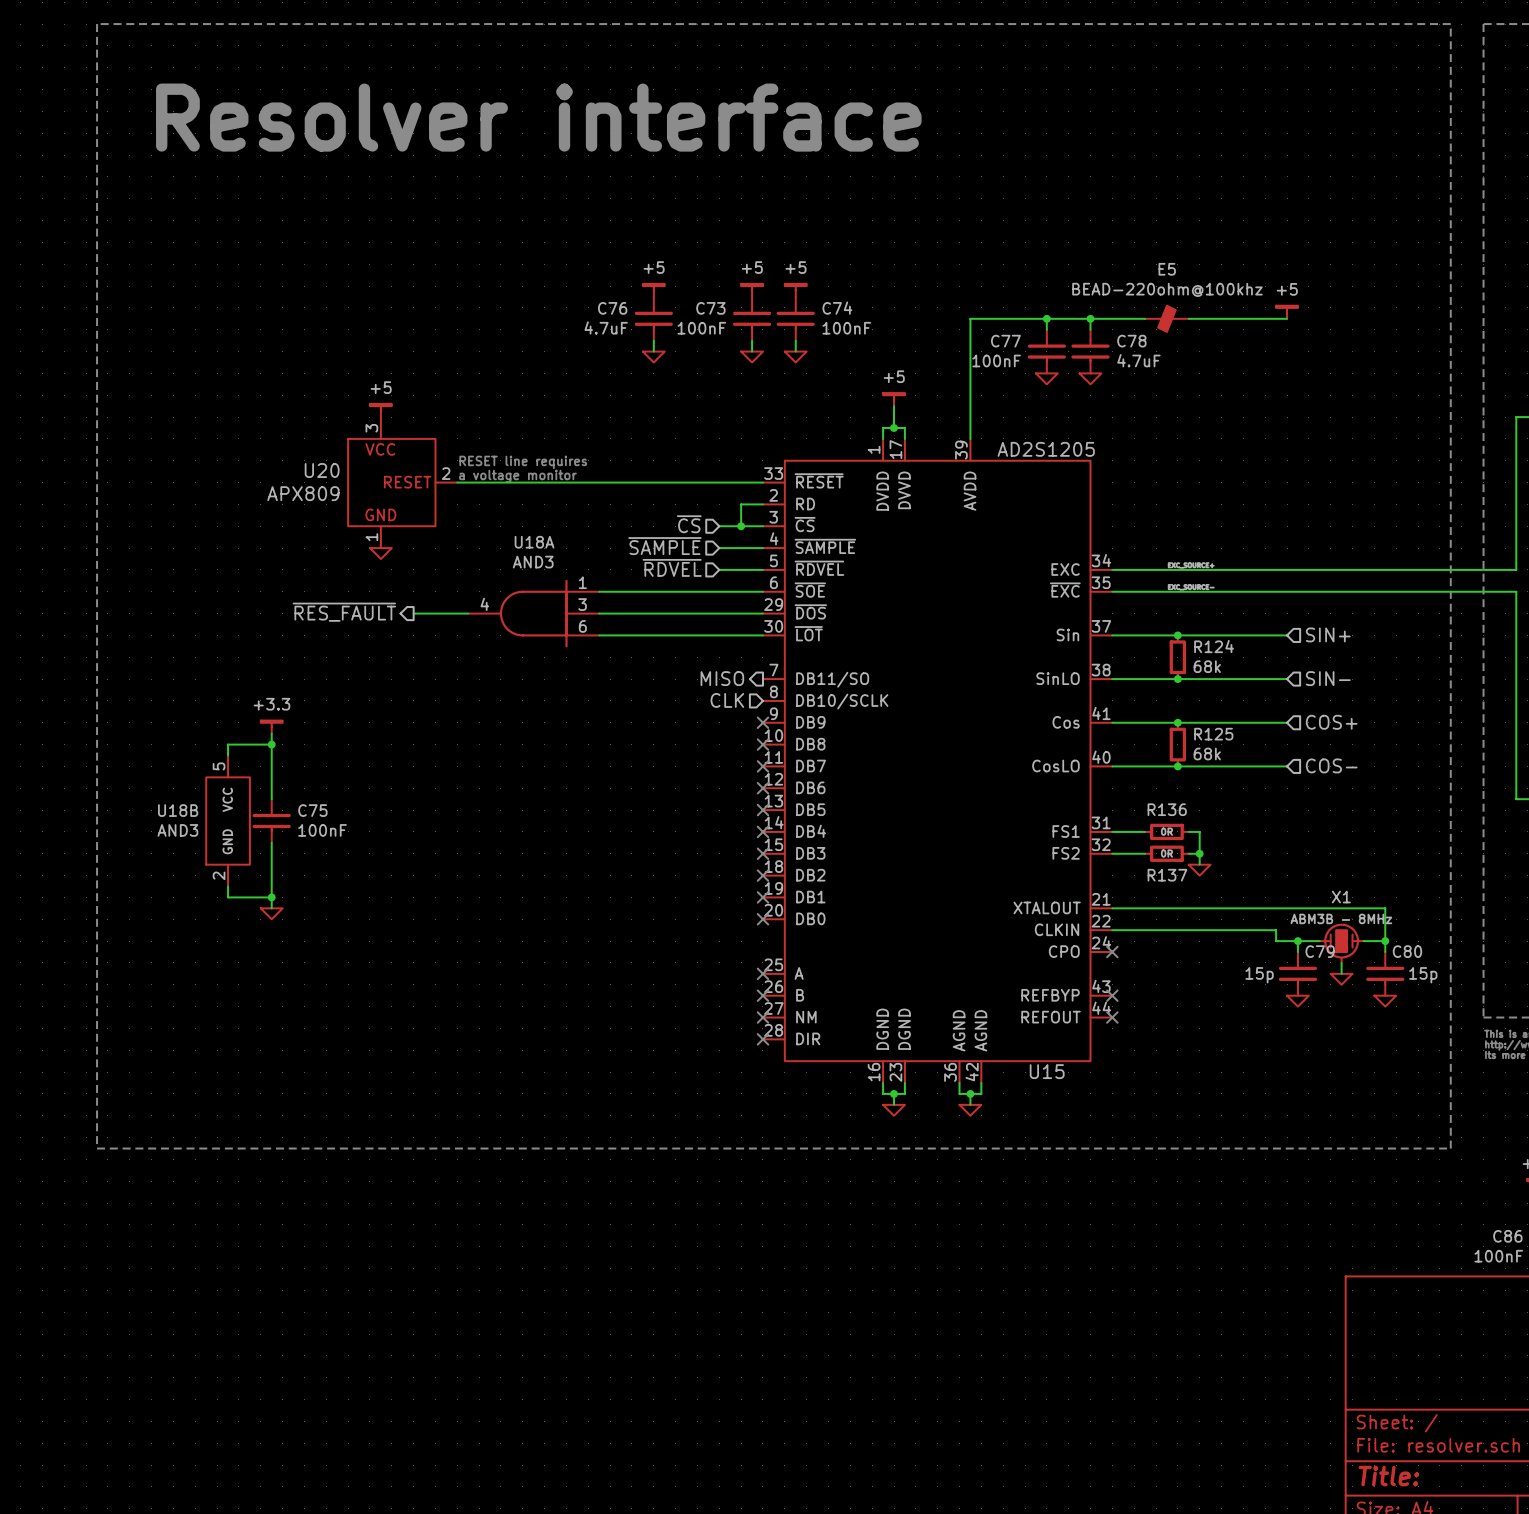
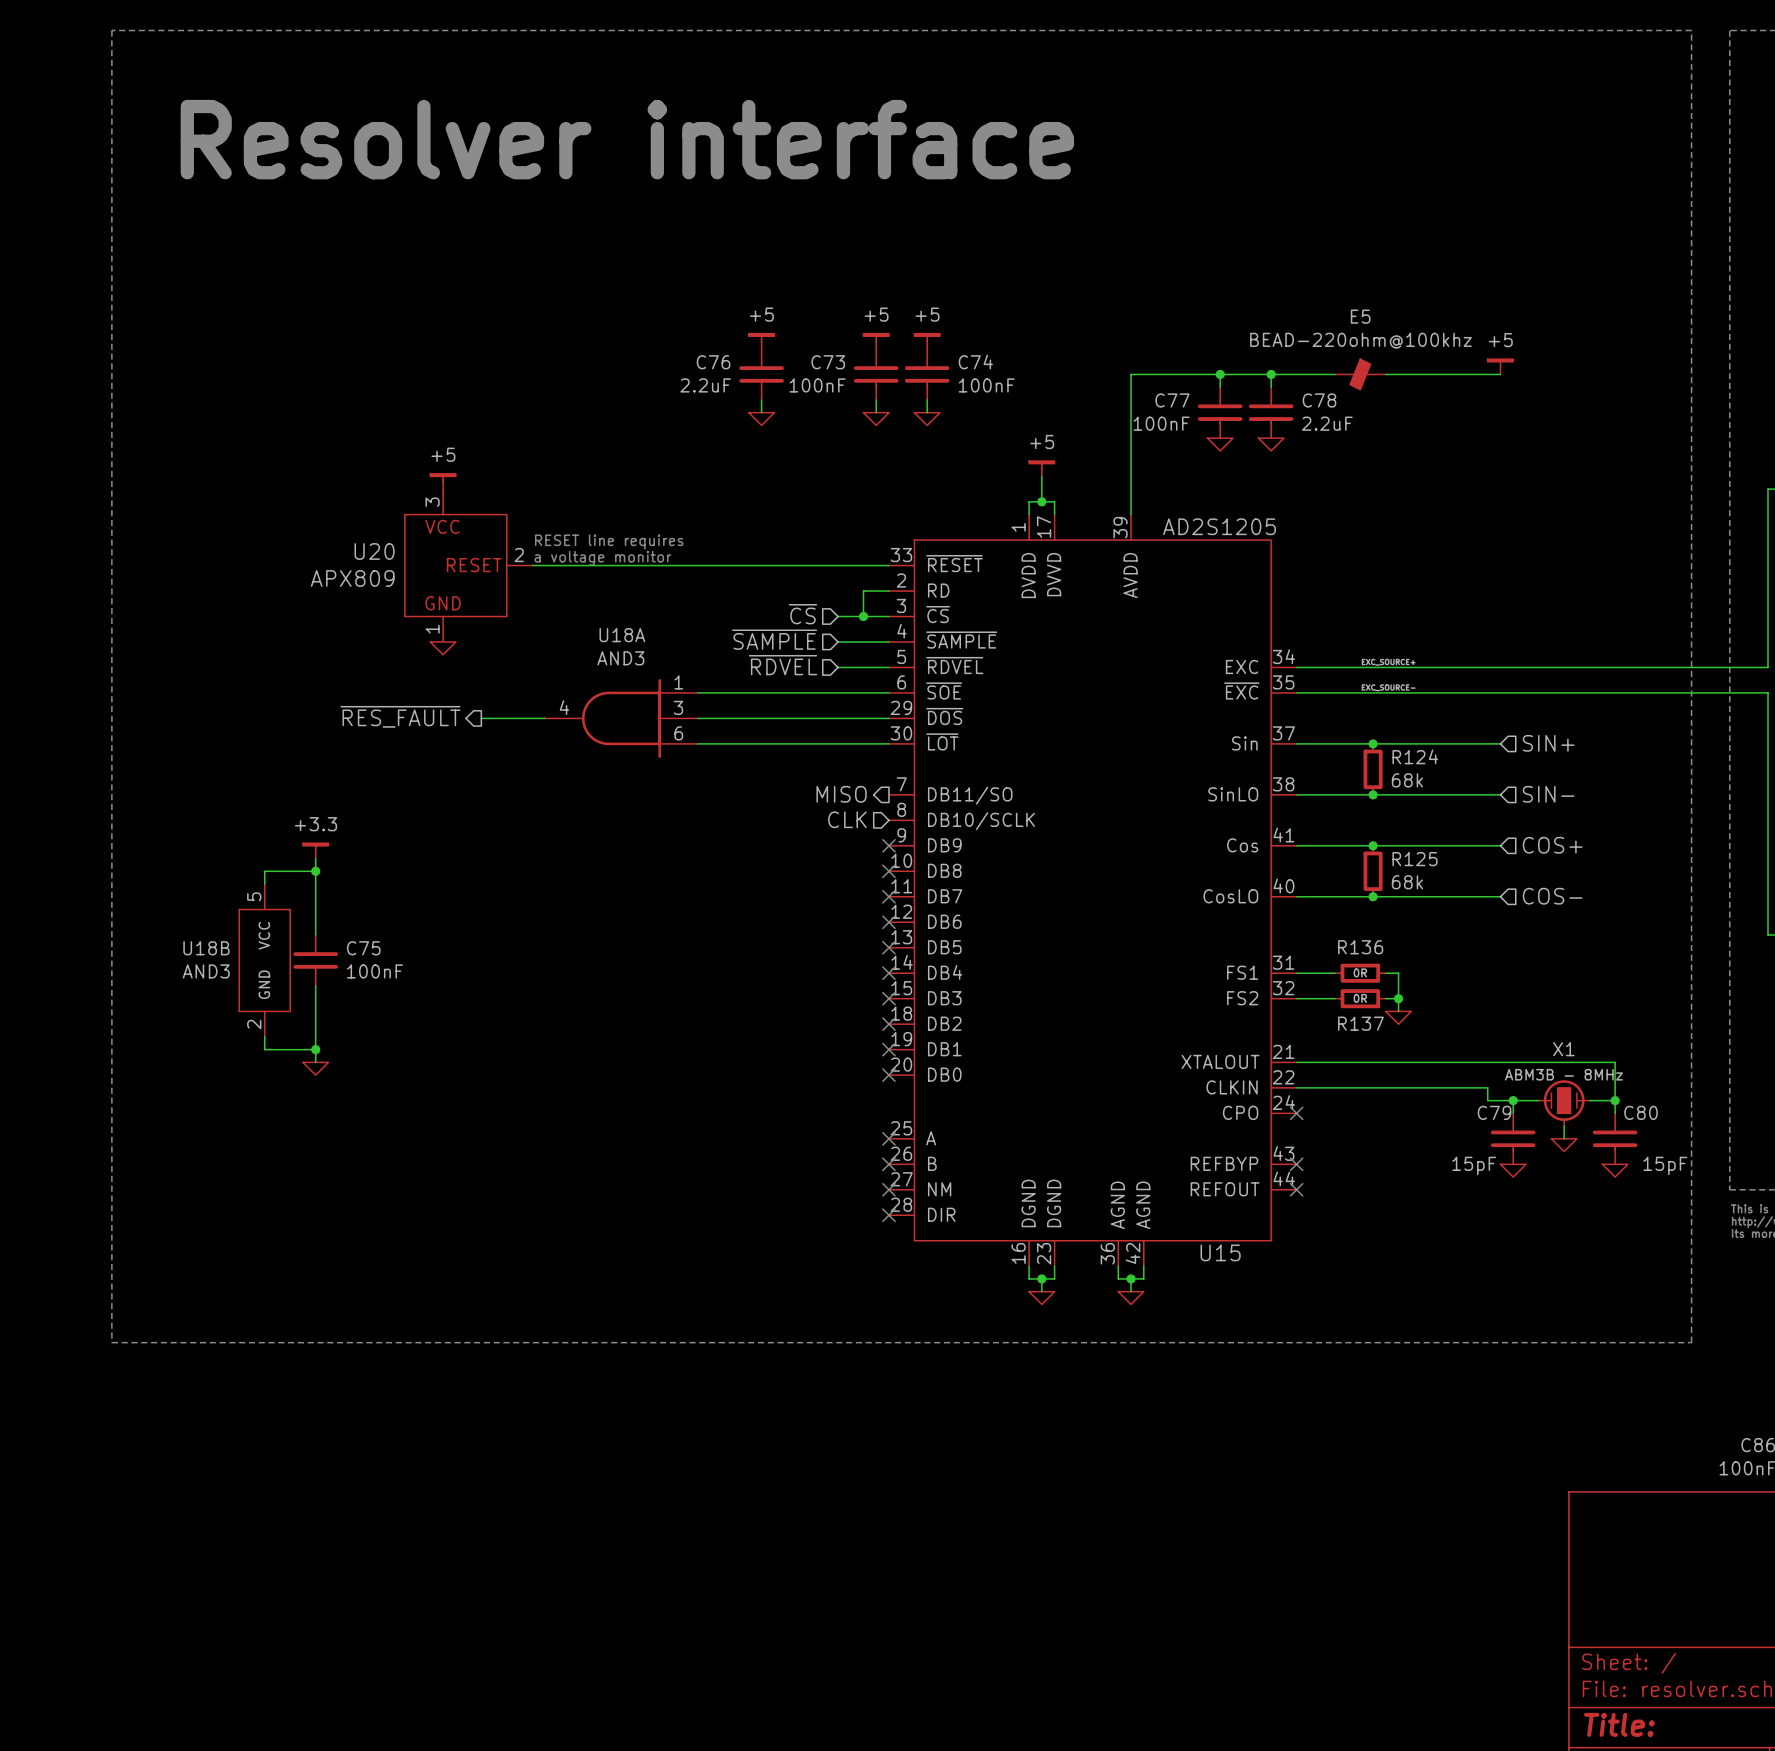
C76 value: 4.7uF (606, 327) -> 2.2uF (705, 385)
C78 value: 4.7uF (1138, 360) -> 2.2uF (1327, 423)
C79 name position: C79 (1320, 951) -> C79 (1494, 1112)
C79 value: 15p (1259, 975) -> 15pF (1474, 1165)
C80 value: 15p (1423, 975) -> 15pF (1665, 1165)

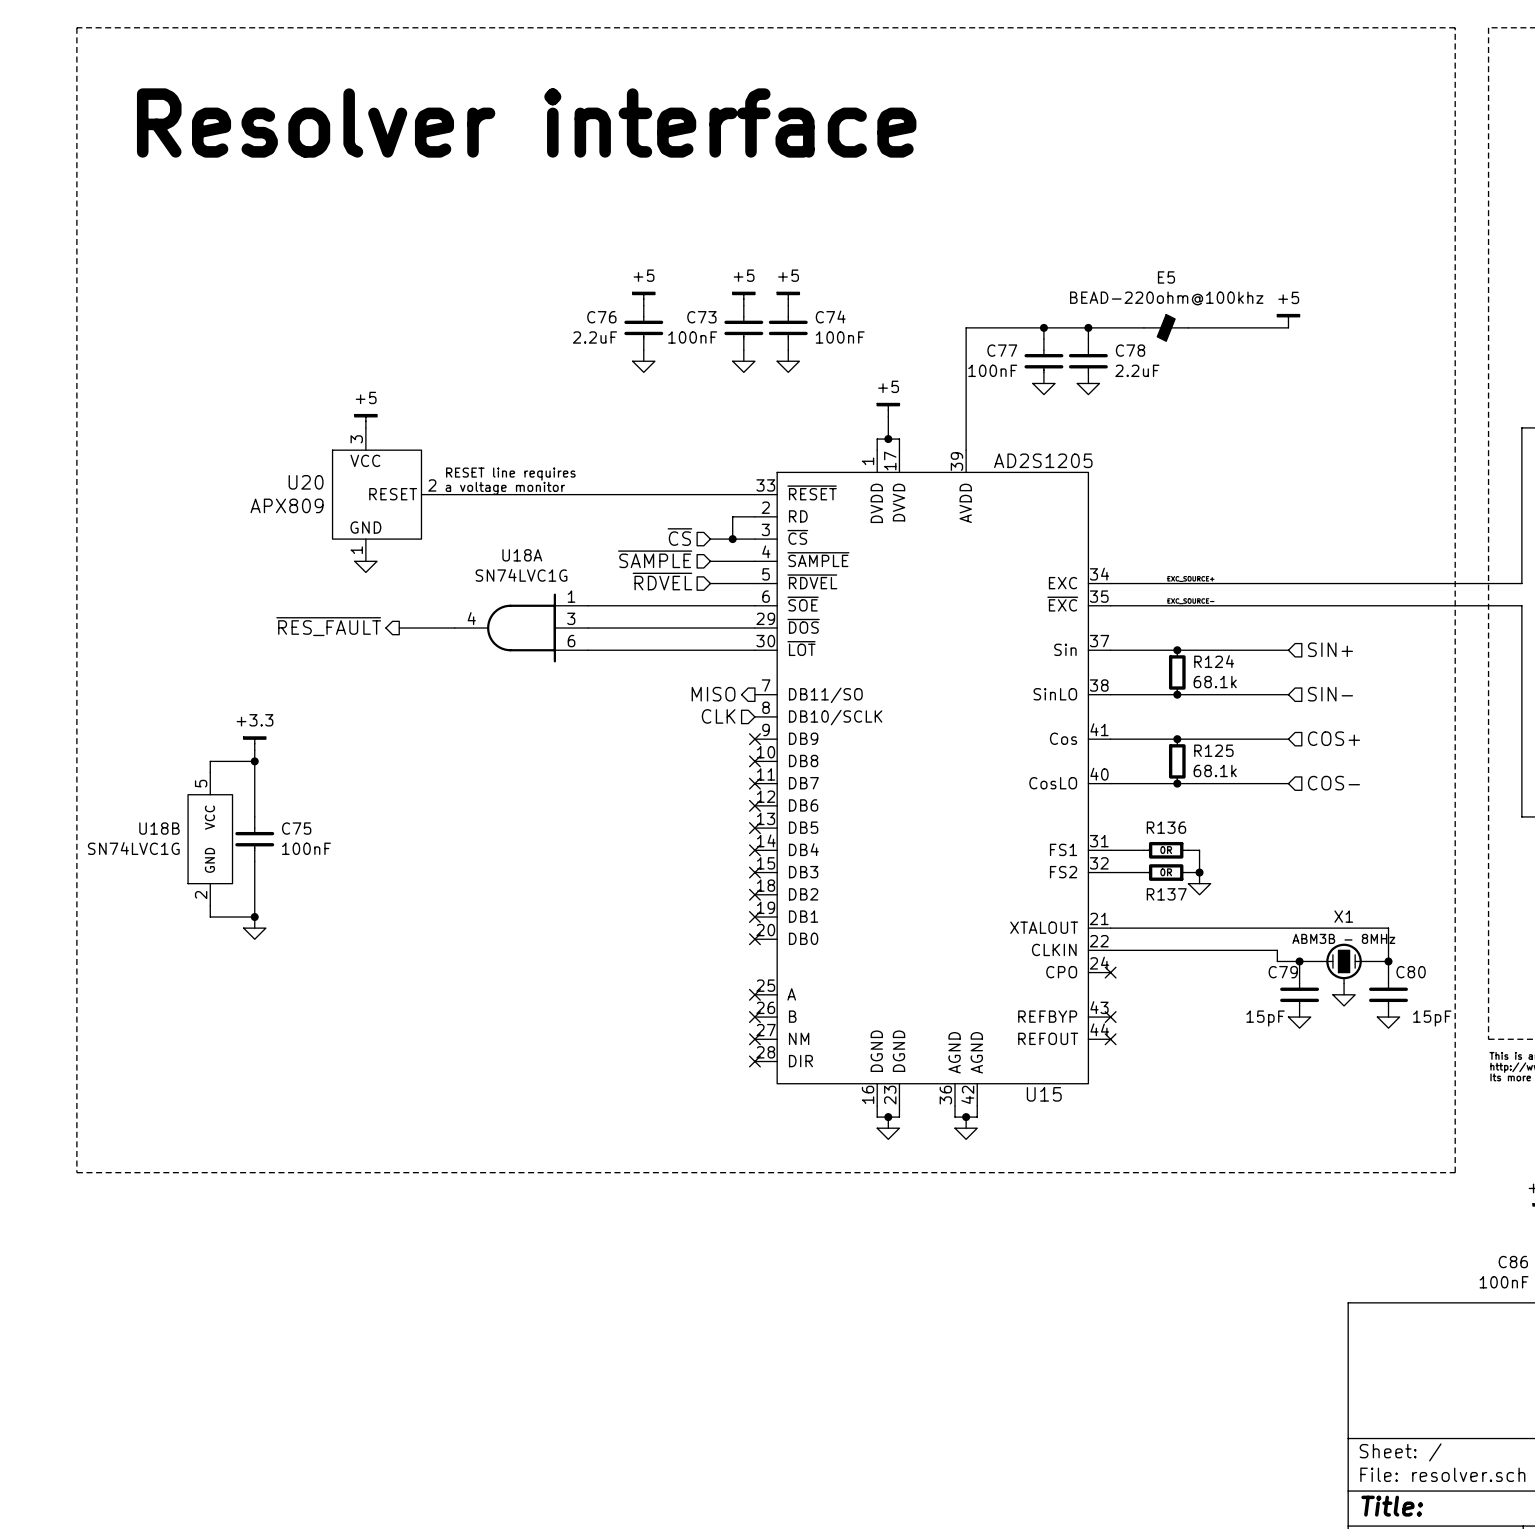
U18A value: AND3 (620, 658) -> SN74LVC1G (521, 575)
R124 value: 68k (1407, 780) -> 68.1k (1215, 682)
R125 value: 68k (1407, 882) -> 68.1k (1215, 770)
U18B value: AND3 (206, 971) -> SN74LVC1G (133, 848)

